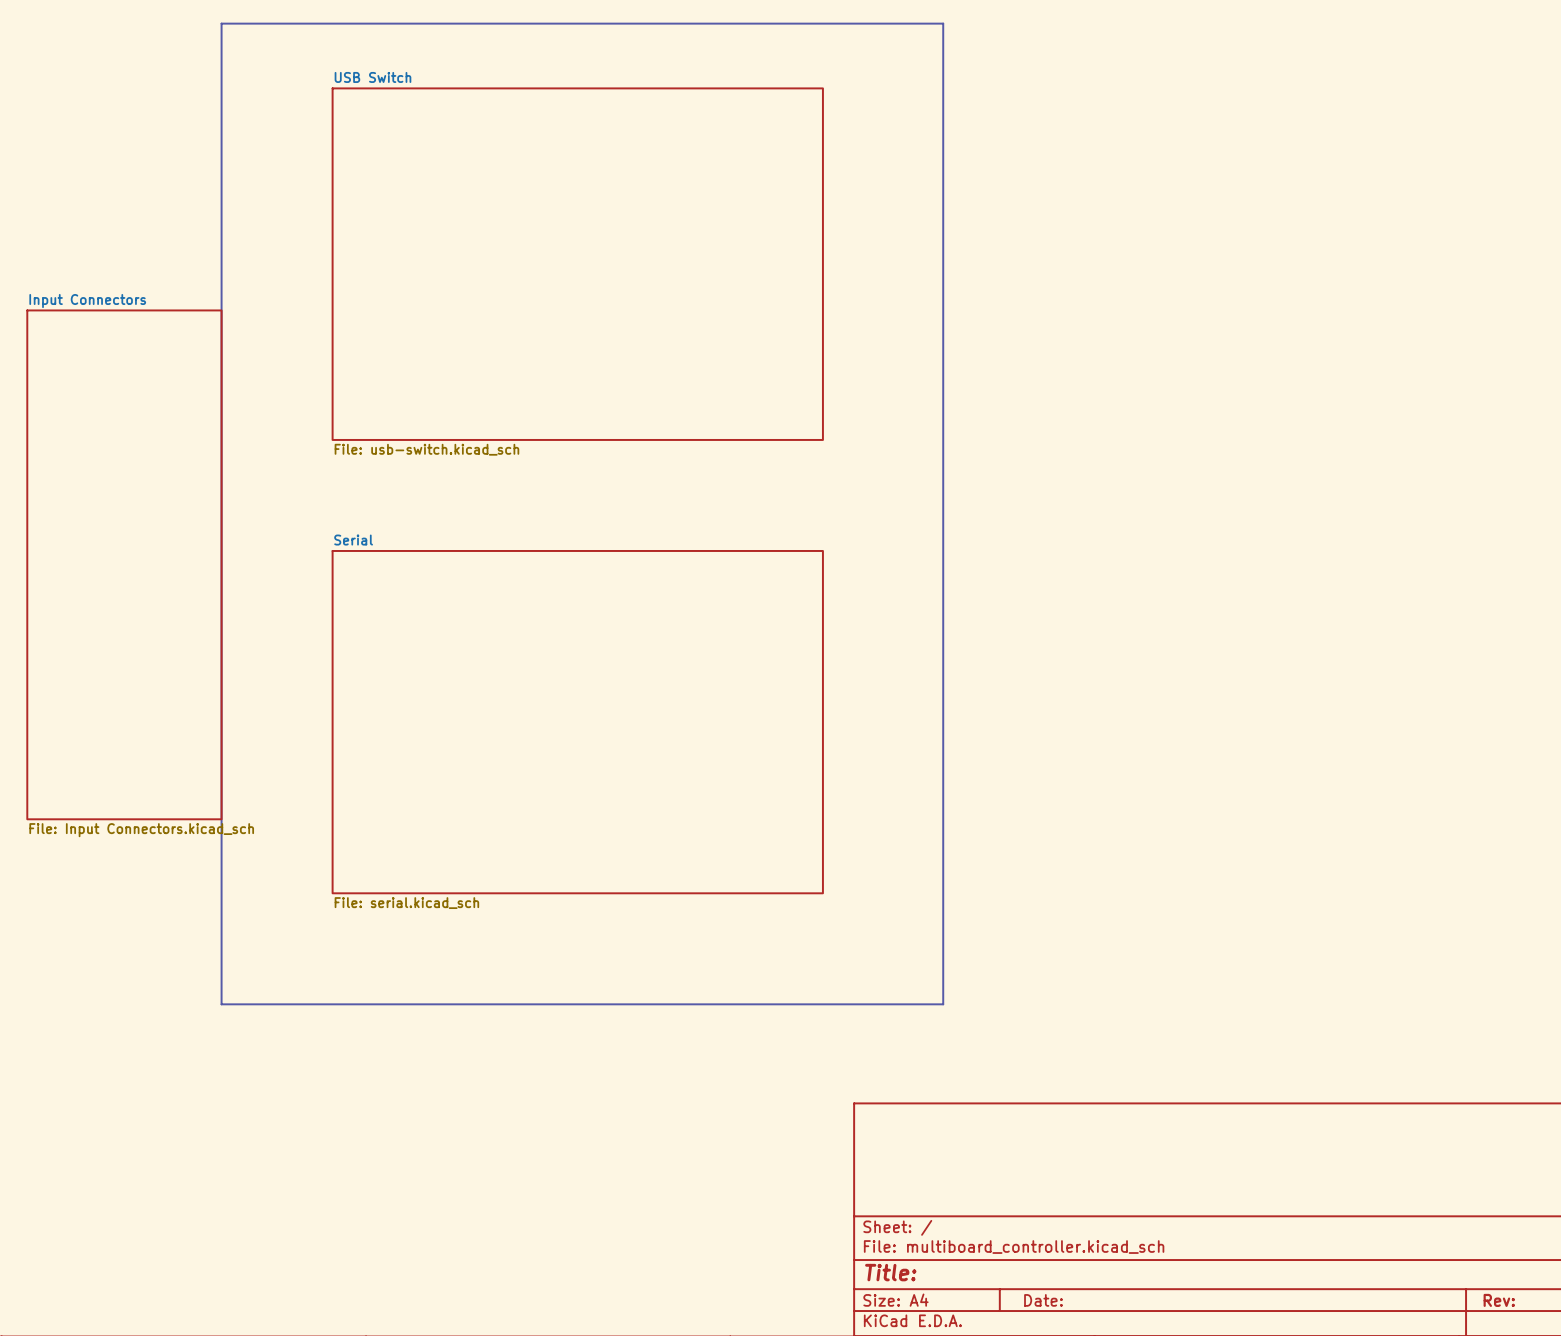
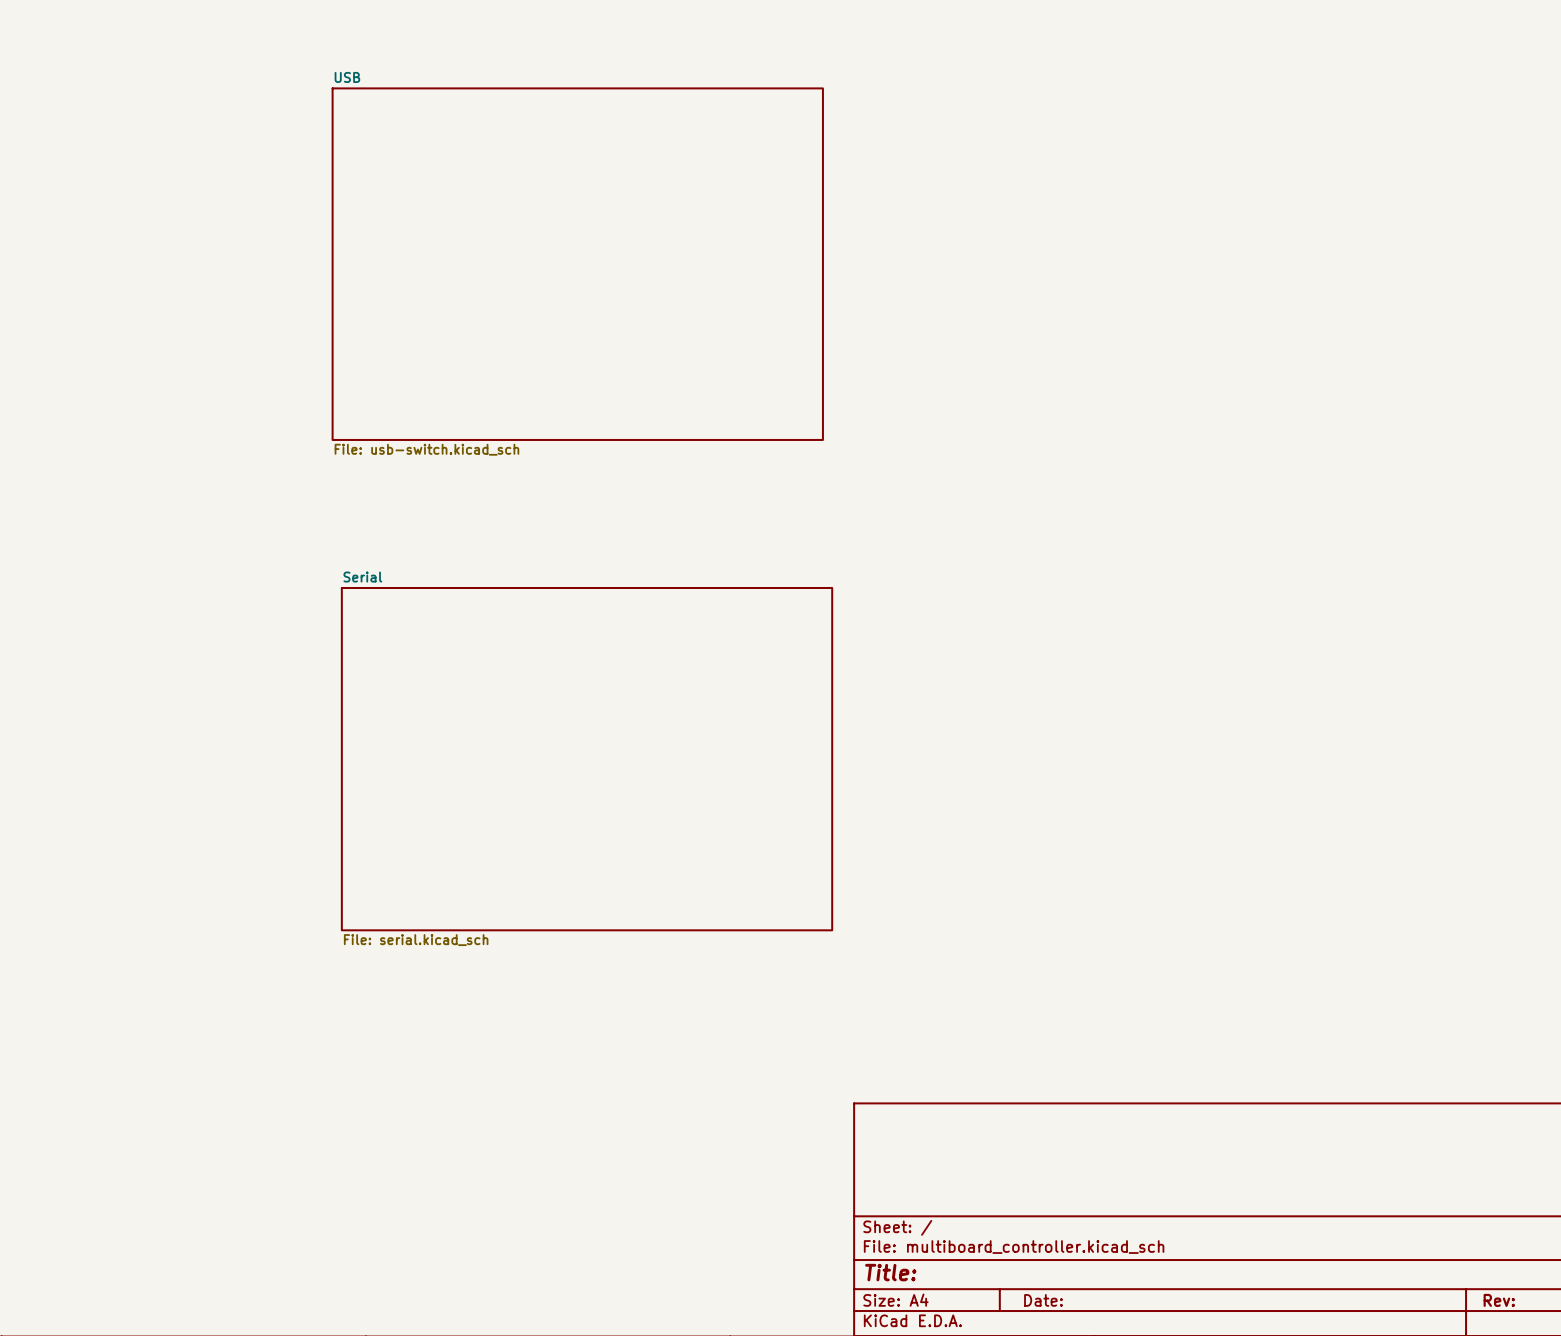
line: (221, 23) (943, 23) (943, 1004) (221, 1004) (221, 23) -> none
sheet USB Switch name: USB Switch (372, 77) -> USB (347, 77)
sheet Input Connectors: File: Input Connectors.kicad_sch (124, 564) -> none
sheet Serial position: (577, 722) -> (587, 759)

